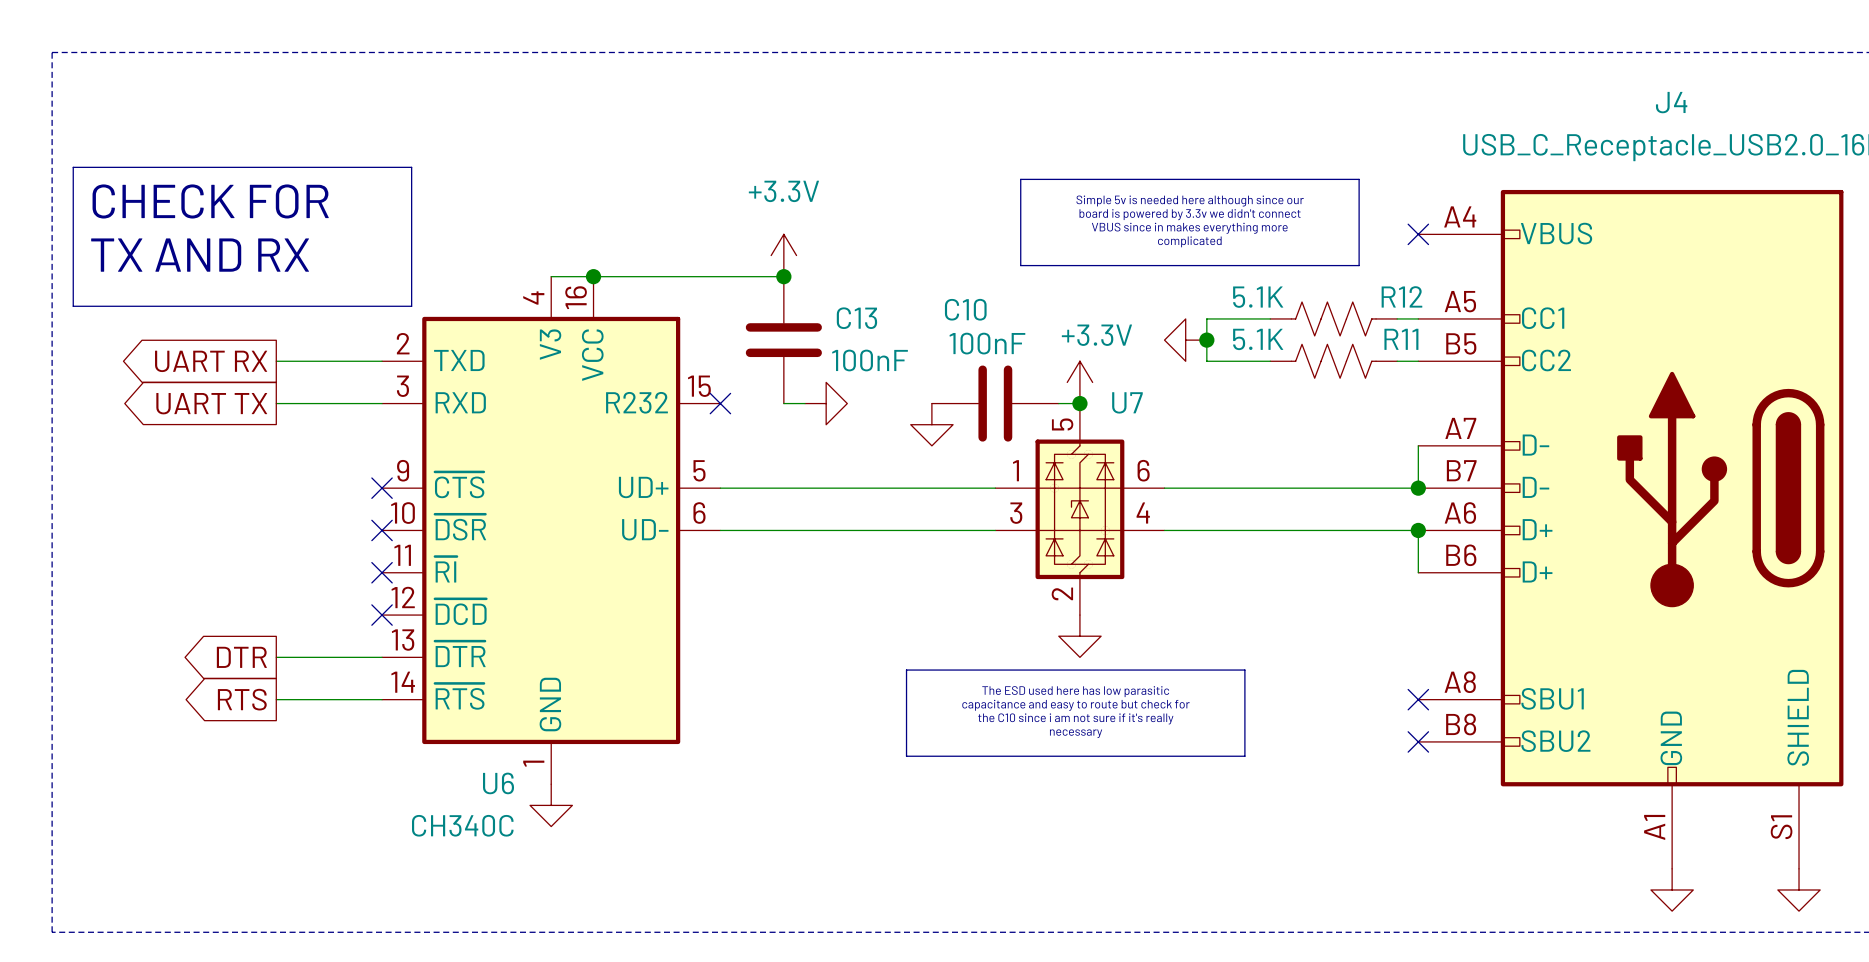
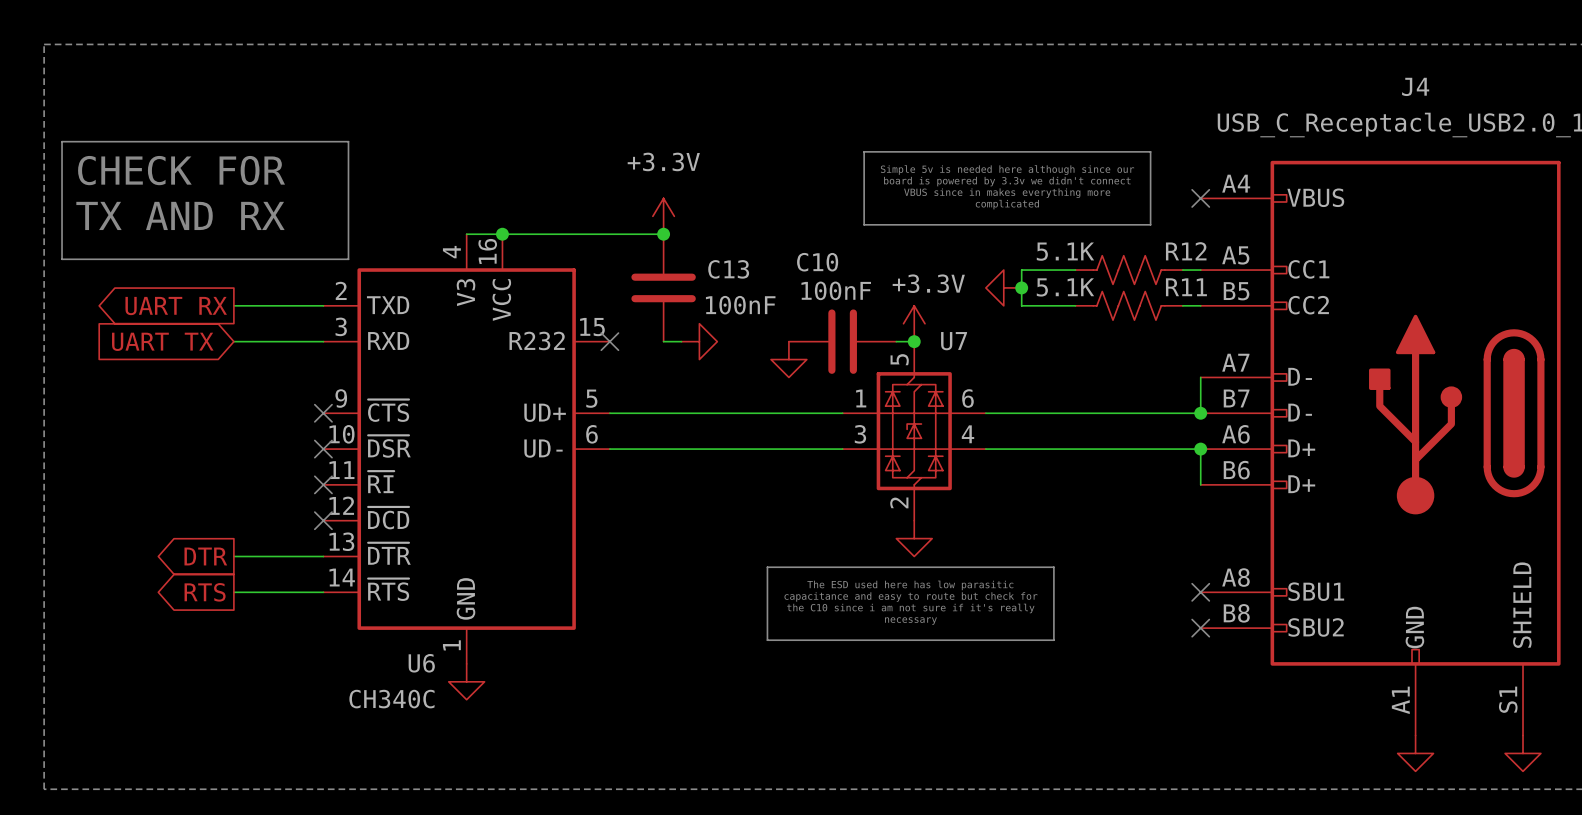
global label shape: output (211, 403) -> input (162, 341)

